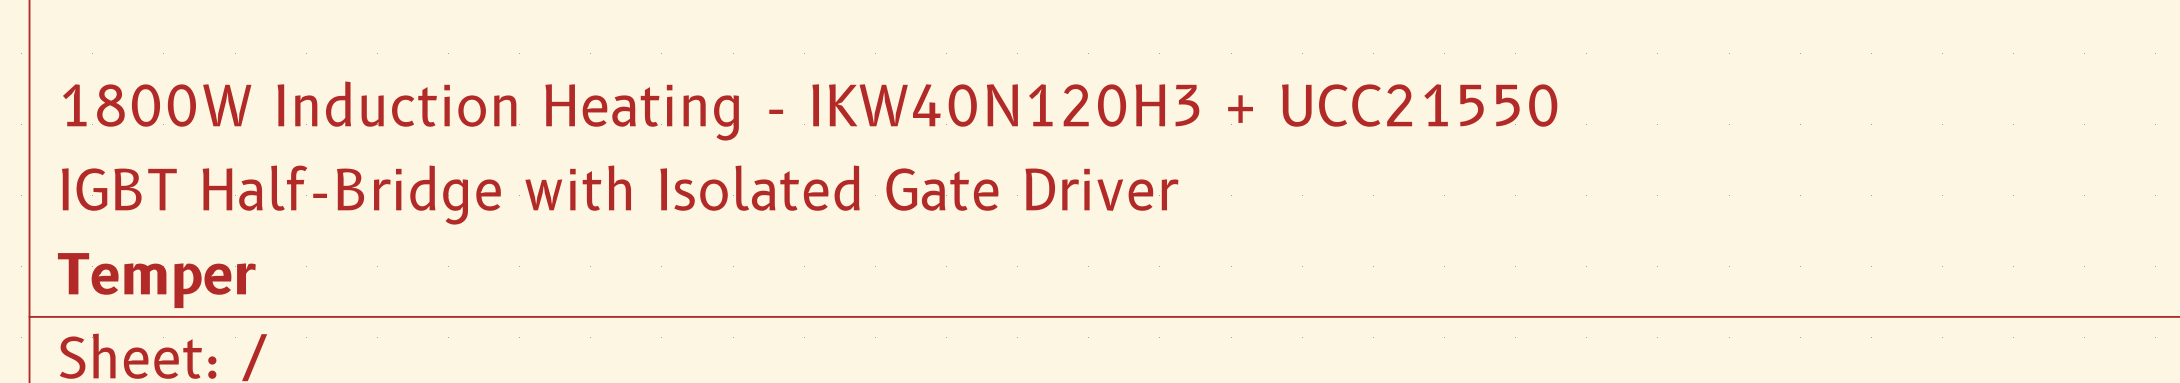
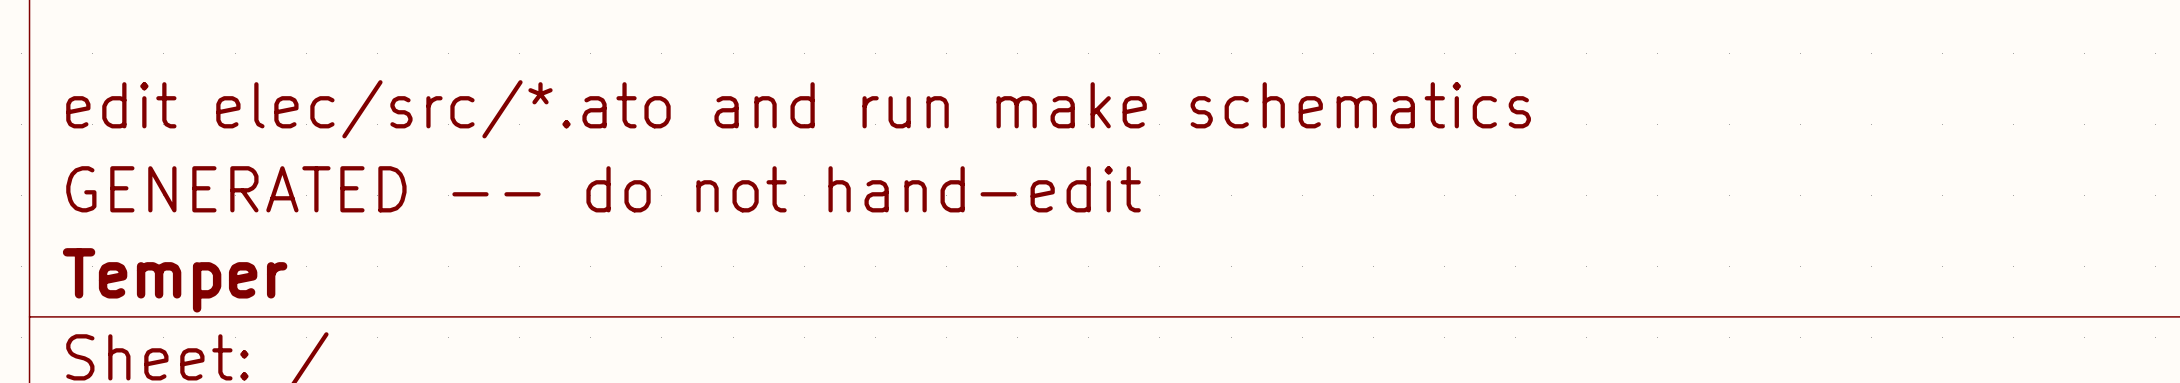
title block: 1800W Induction Heating - IKW40N120H3 + UCC21550 (810, 111) -> edit elec/src/*.ato and run make schematics (798, 109)
title block: IGBT Half-Bridge with Isolated Gate Driver (620, 195) -> GENERATED -- do not hand-edit (603, 189)

